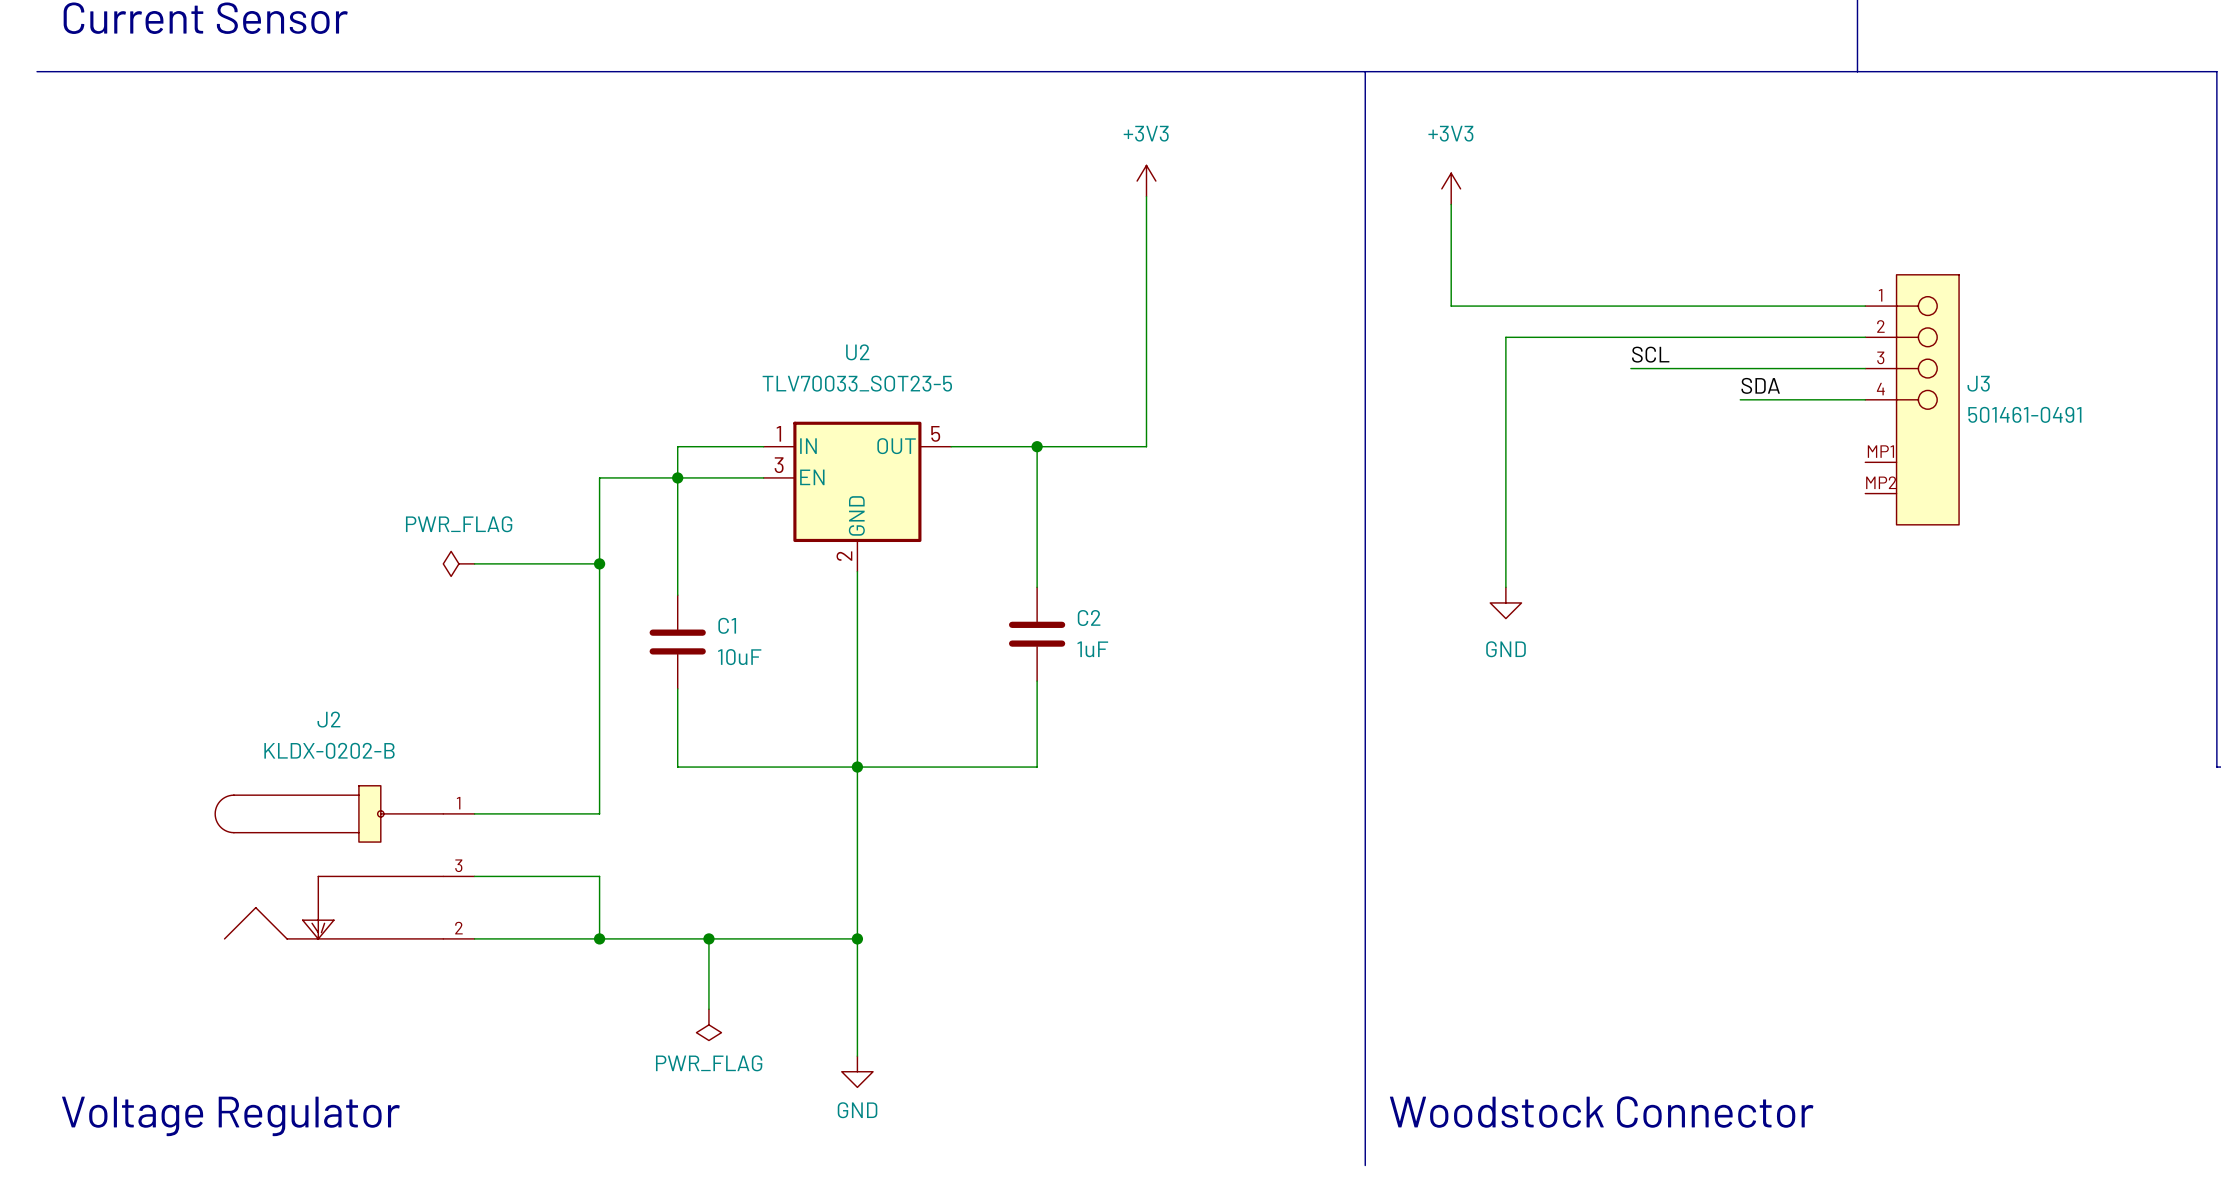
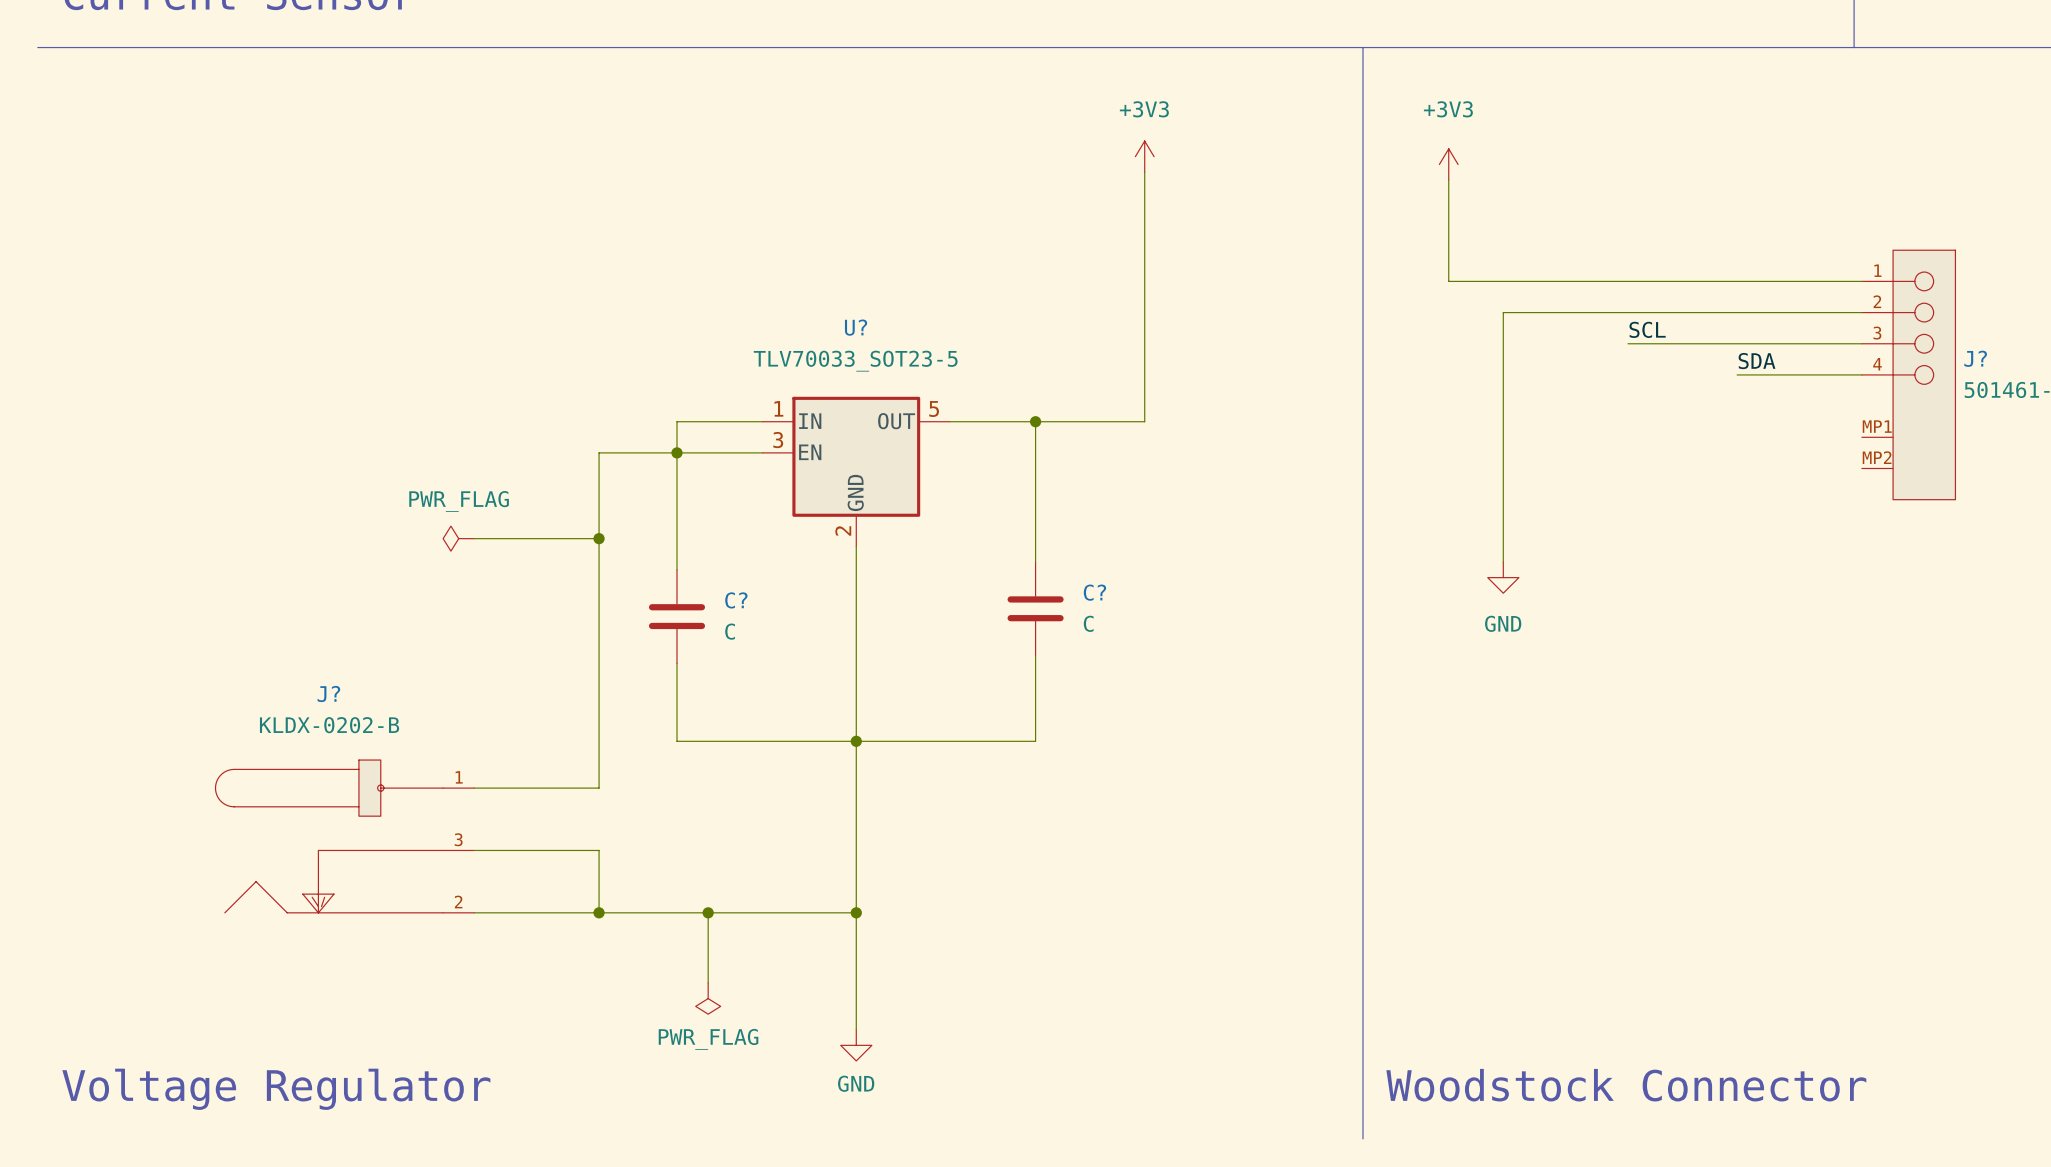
U2 name: U2 (857, 352) -> U? (856, 327)
J3 name: J3 (1978, 383) -> J? (1975, 358)
C2 name: C2 (1089, 618) -> C? (1094, 592)
C1 name: C1 (727, 625) -> C? (736, 600)
C2 value: 1uF (1092, 649) -> C (1088, 623)
C1 value: 10uF (739, 657) -> C (730, 631)
J2 name: J2 (328, 719) -> J? (328, 693)

